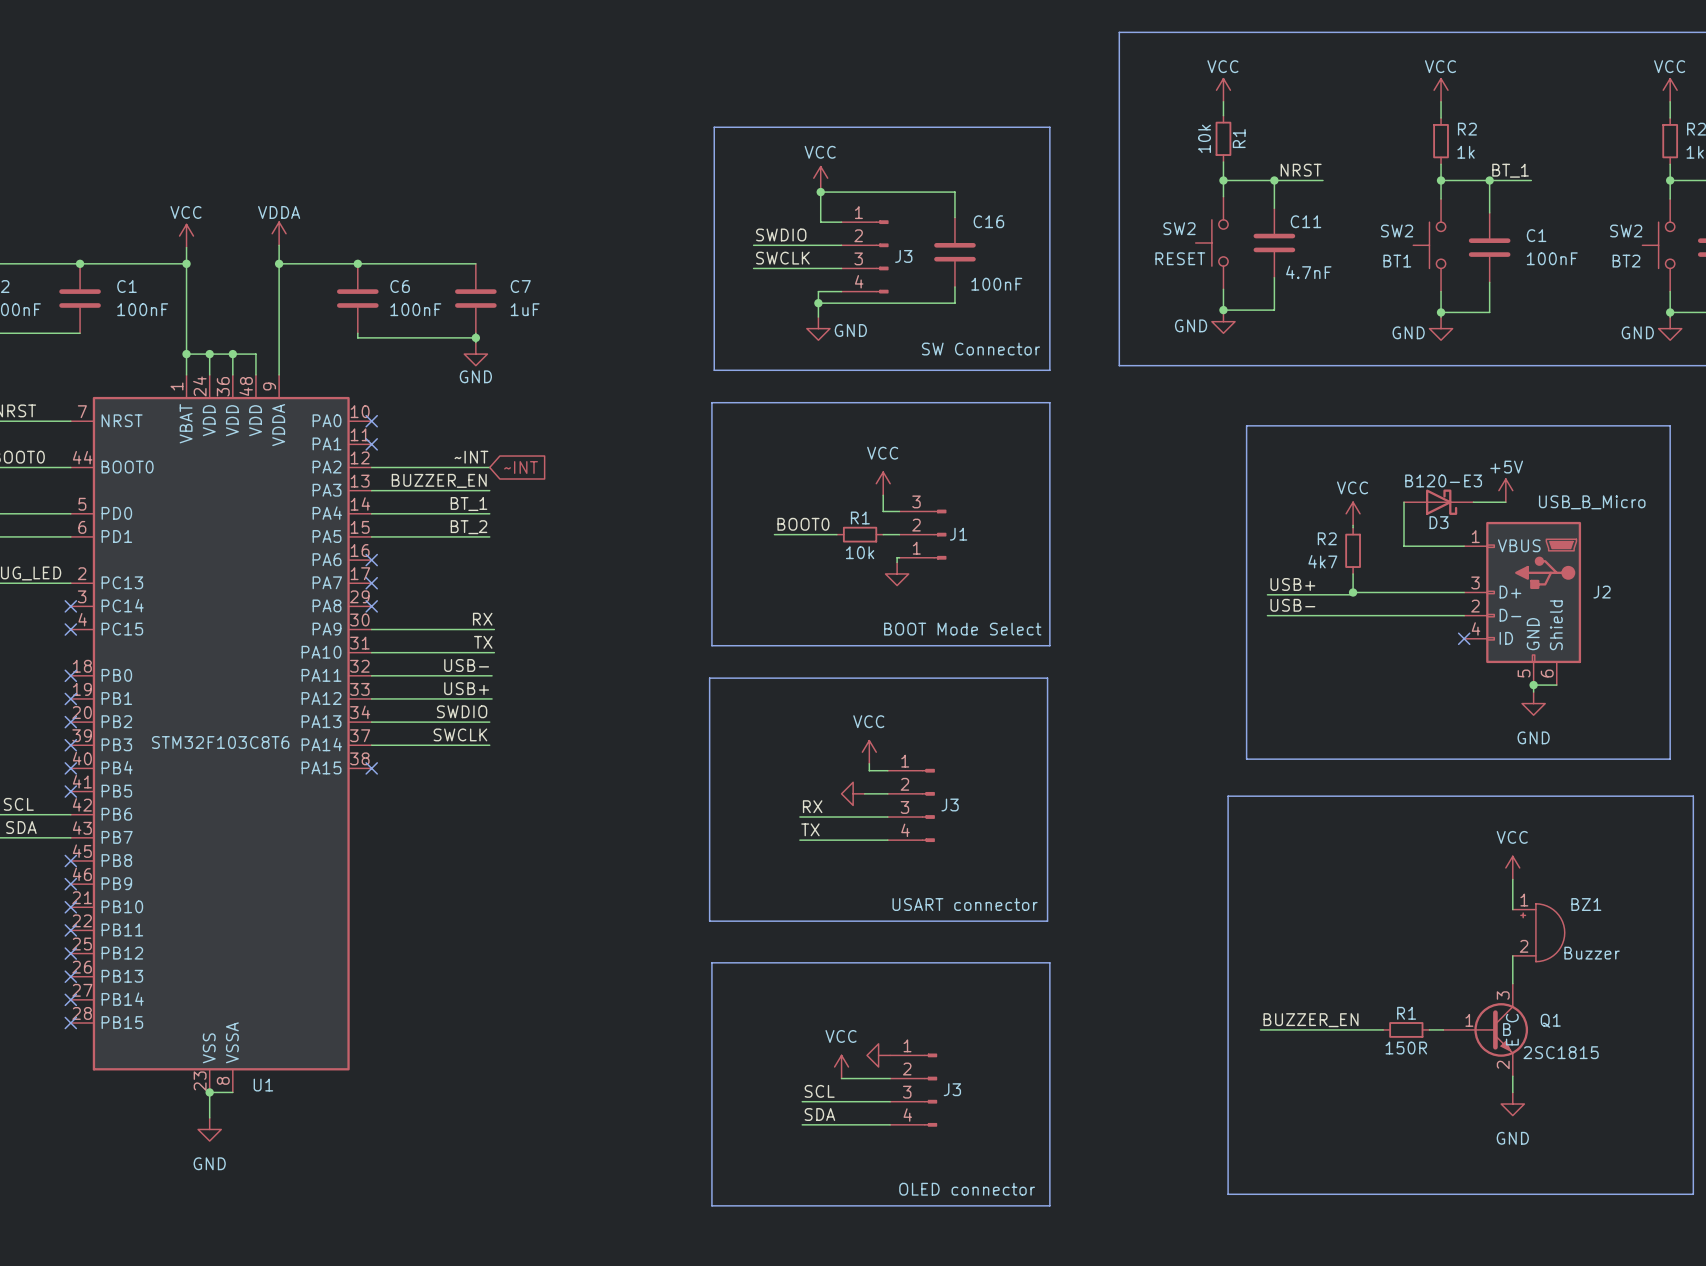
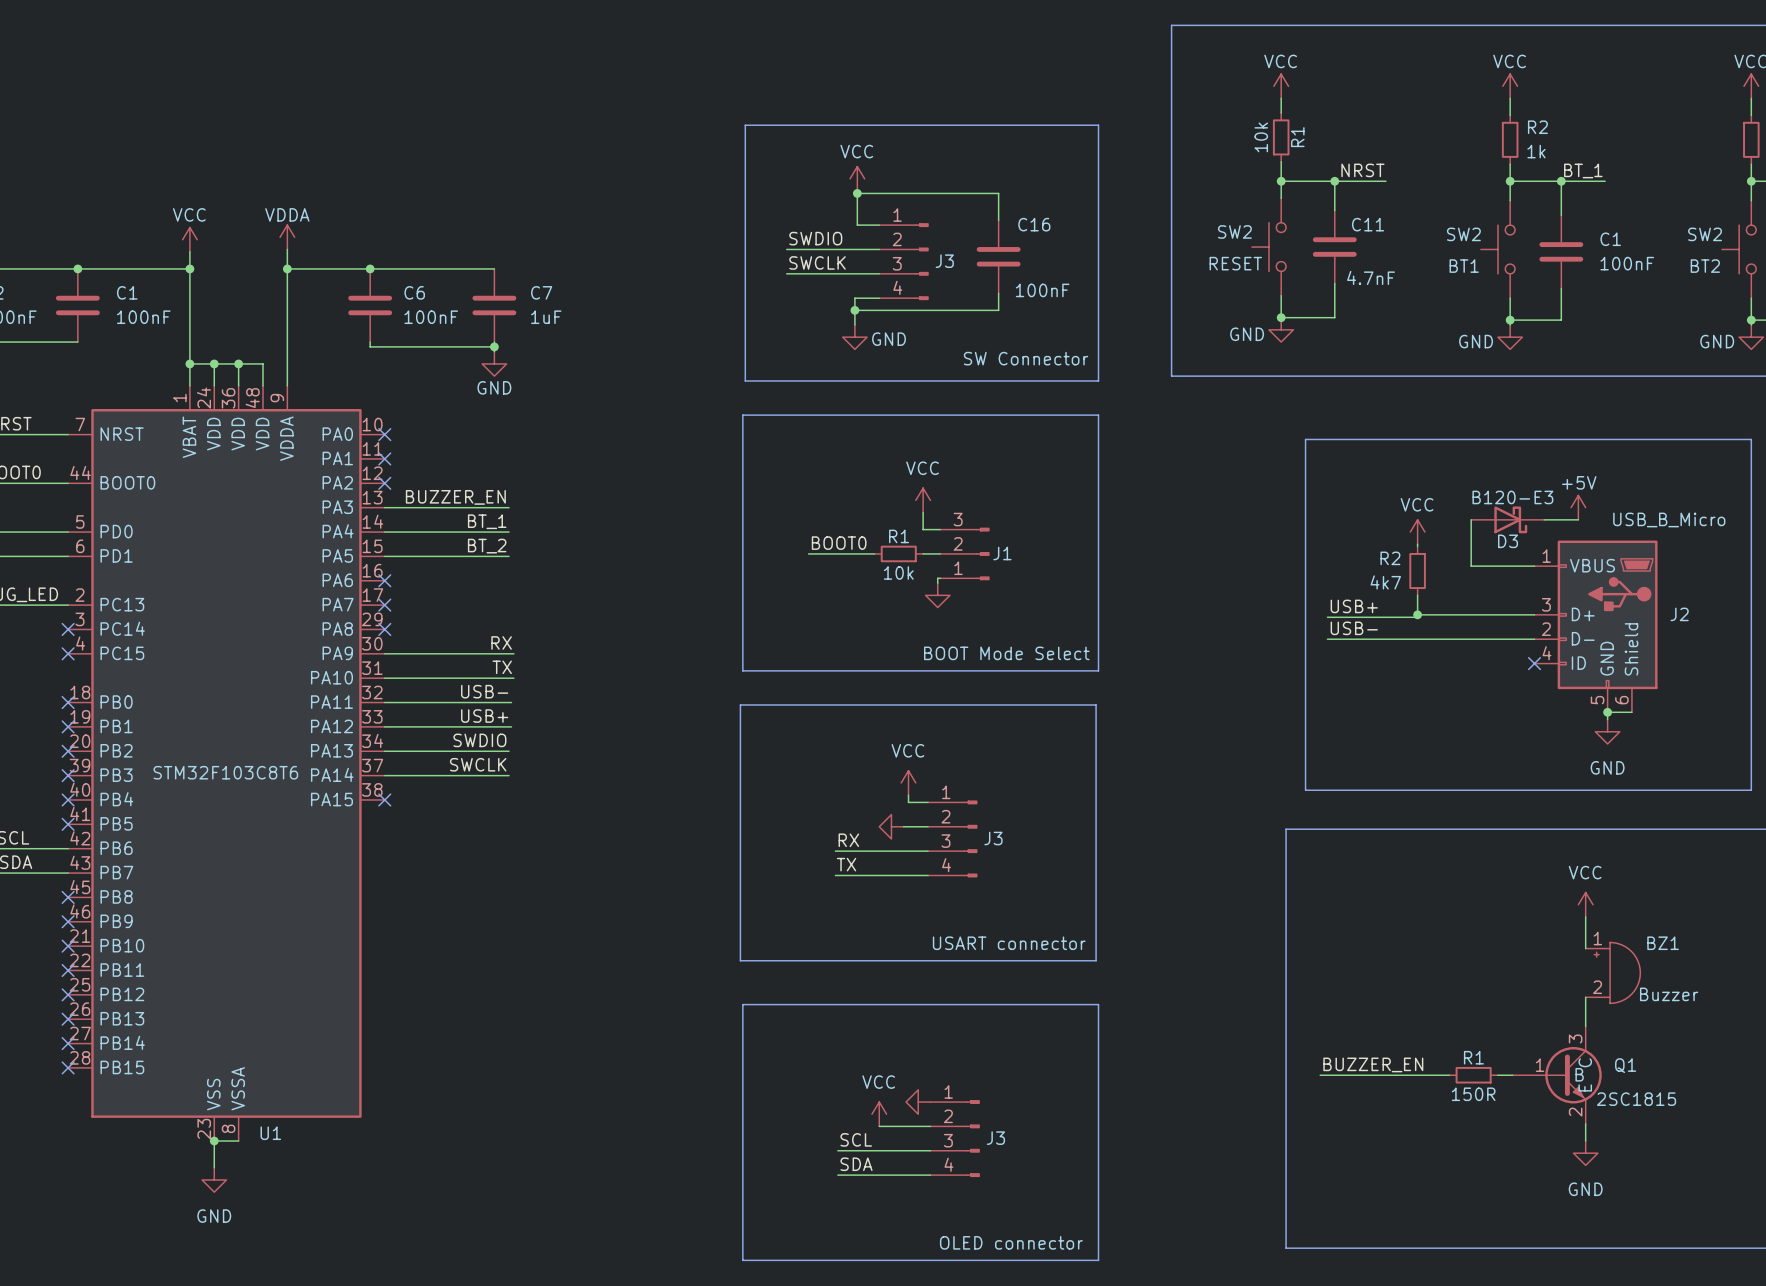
label: ~INT (471, 457) -> none
wire: (371, 467) (489, 467) -> none
no-connect mark: none -> (384, 483)
global label: ~INT (521, 467) -> none

